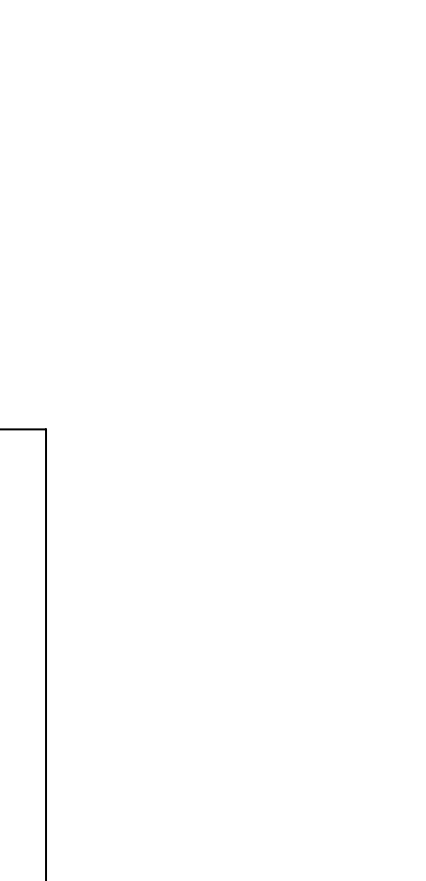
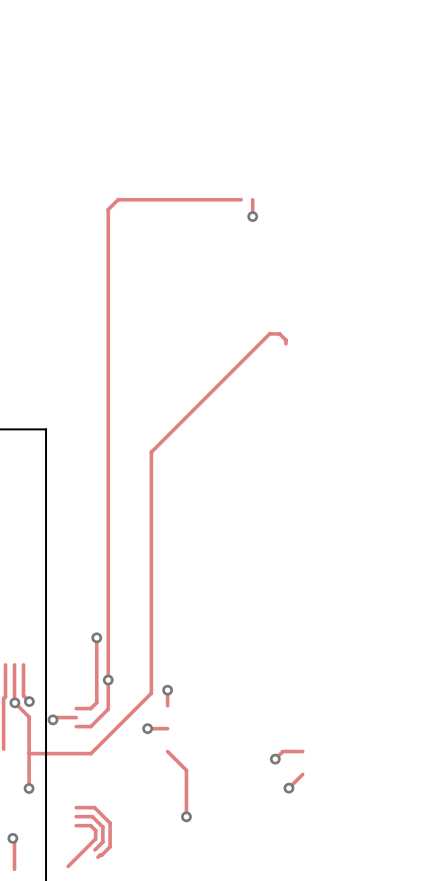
track: none -> (241, 199) (118, 199) (108, 209) (108, 709) (90, 726) (76, 726)
track: none -> (252, 199) (252, 216)
via: none -> (252, 216)
track: none -> (285, 343) (285, 340) (279, 333) (269, 333) (151, 452) (151, 693) (91, 753) (29, 753)
track: none -> (96, 637) (96, 702) (90, 708) (76, 708)
via: none -> (96, 637)
track: none -> (5, 664) (3, 749)
track: none -> (14, 664) (14, 702) (29, 717) (29, 788)
track: none -> (23, 664) (23, 695) (29, 701)
via: none -> (108, 680)
track: none -> (167, 690) (167, 705)
via: none -> (167, 690)
via: none -> (29, 701)
via: none -> (14, 702)
track: none -> (76, 717) (55, 717) (53, 719)
via: none -> (53, 719)
track: none -> (147, 728) (167, 728)
via: none -> (147, 728)
track: none -> (167, 751) (186, 770) (186, 816)
track: none -> (302, 751) (282, 751) (275, 759)
via: none -> (275, 759)
track: none -> (302, 774) (288, 788)
via: none -> (29, 788)
via: none -> (288, 788)
track: none -> (76, 807) (94, 807) (110, 823) (110, 846) (97, 857)
track: none -> (76, 816) (92, 816) (102, 827) (102, 842) (94, 850)
via: none -> (186, 816)
track: none -> (76, 825) (90, 825) (95, 830) (95, 838) (68, 866)
track: none -> (12, 838) (14, 840) (14, 869)
via: none -> (12, 838)

